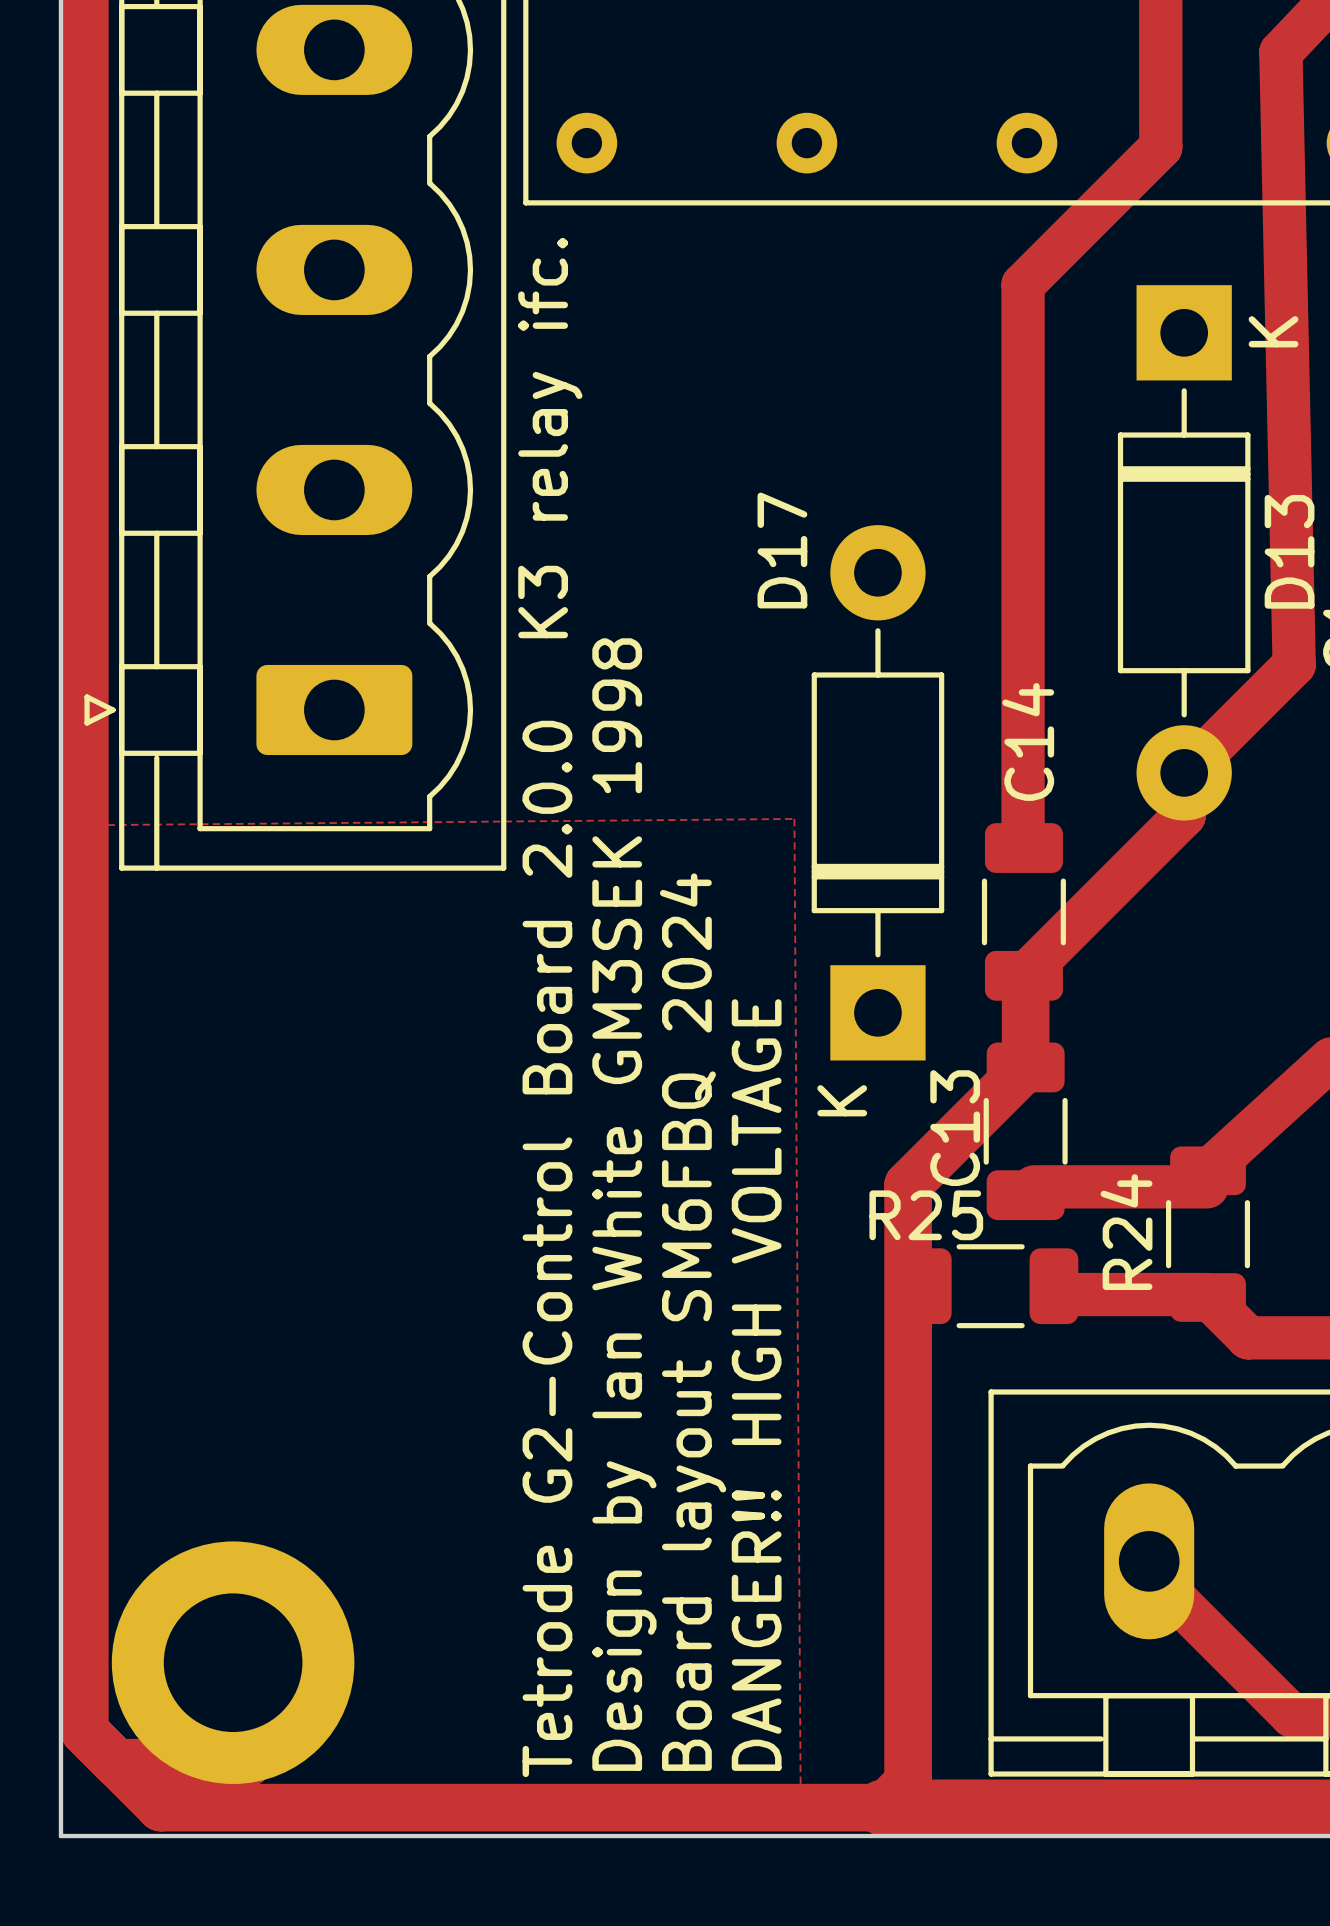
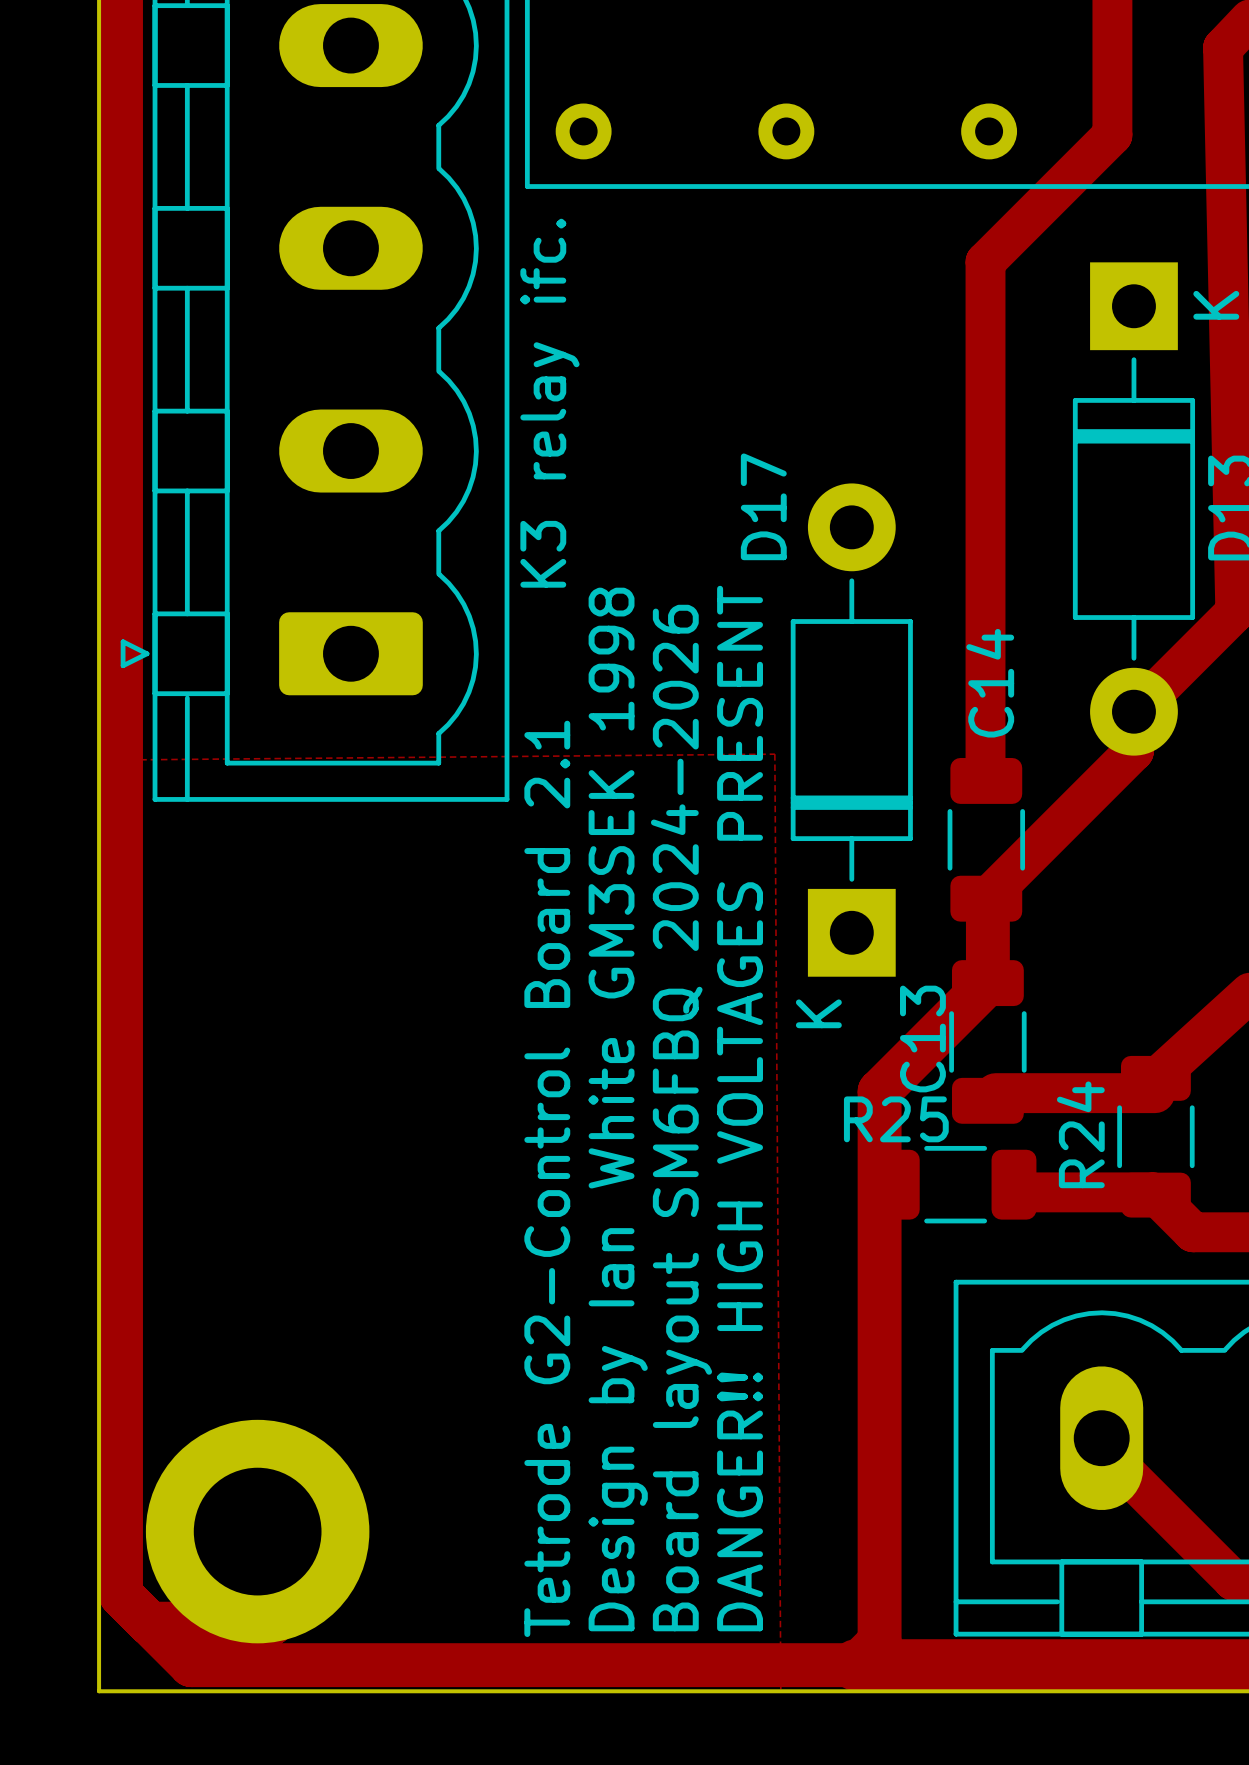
text: Tetrode G2-Control Board 2.0.0 (547, 1248) -> Tetrode G2-Control Board 2.1 (547, 1178)
text: Board layout SM6FBQ 2024 (693, 1322) -> Board layout SM6FBQ 2024-2026 (681, 1118)
text: DANGER!! HIGH VOLTAGE (756, 1385) -> DANGER!! HIGH VOLTAGES PRESENT (740, 1108)

